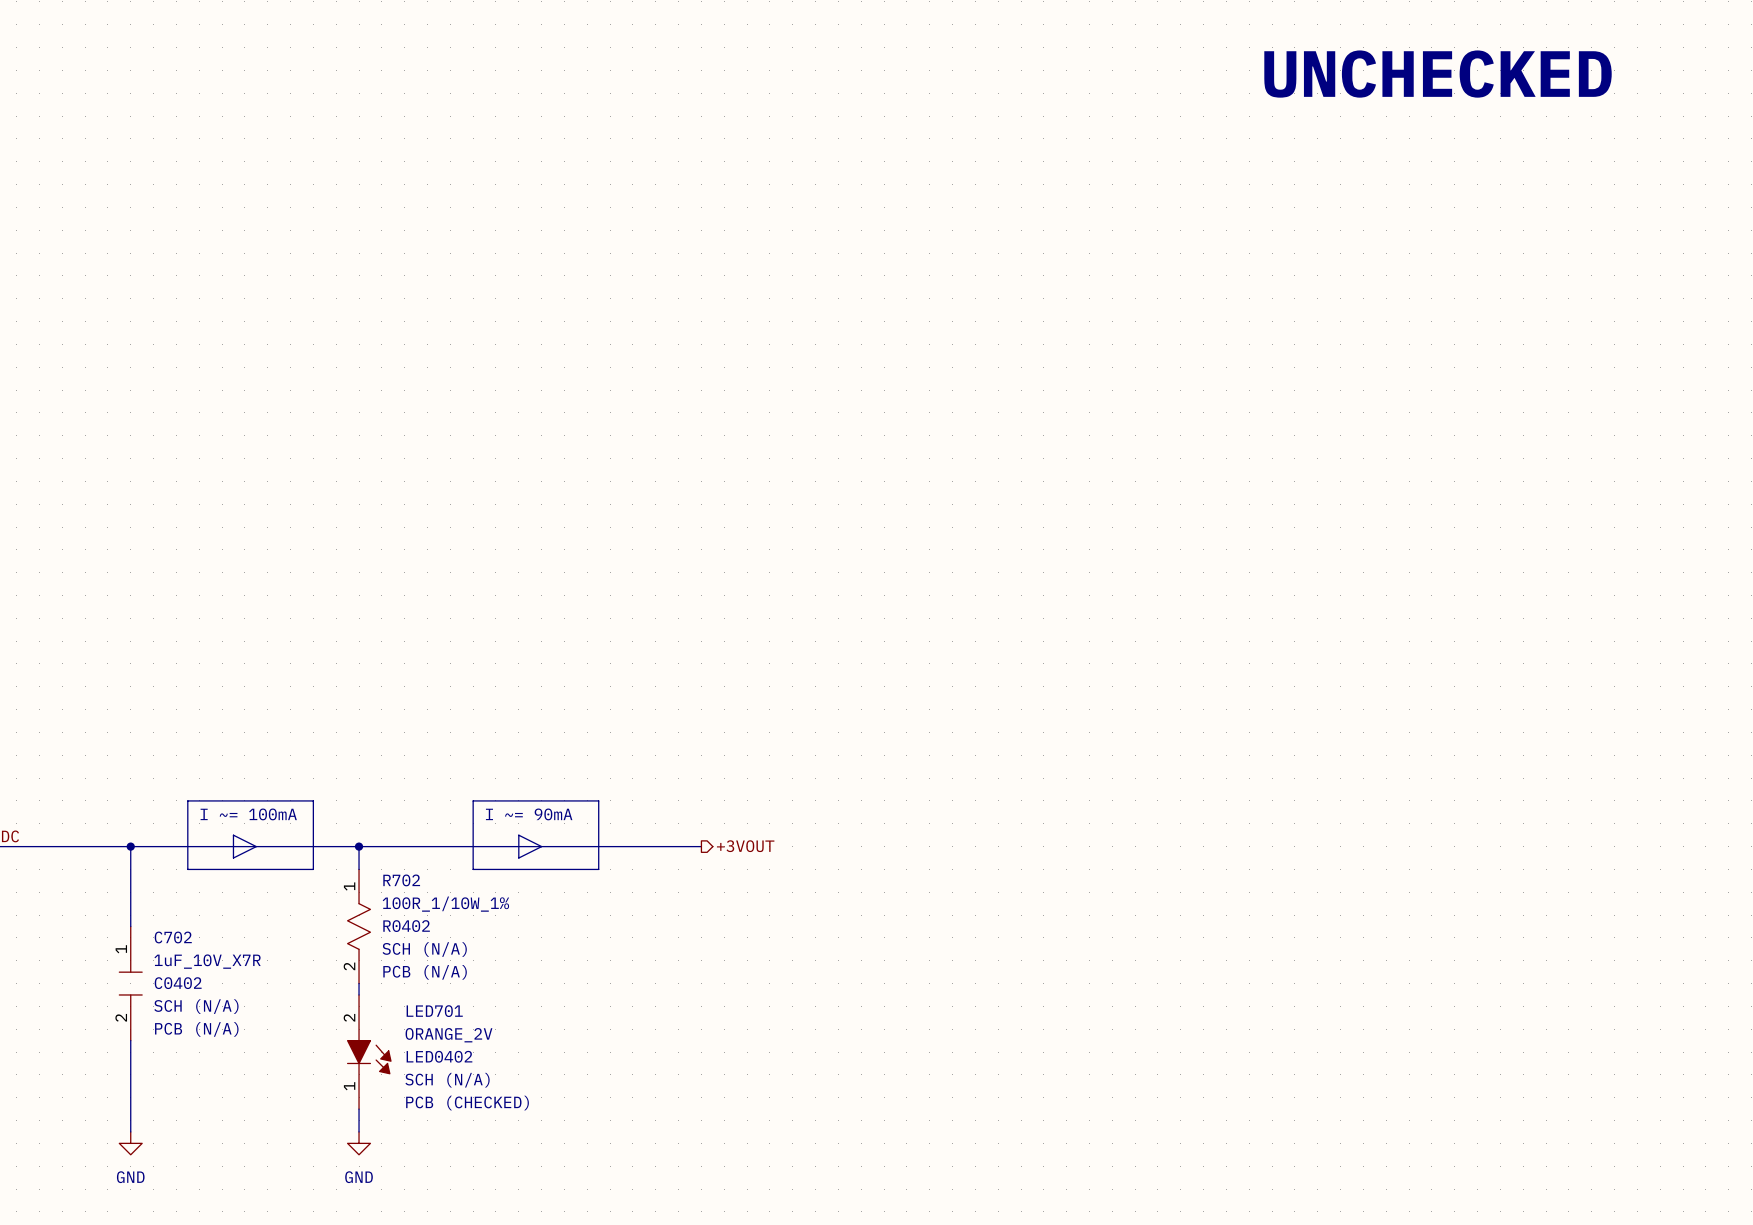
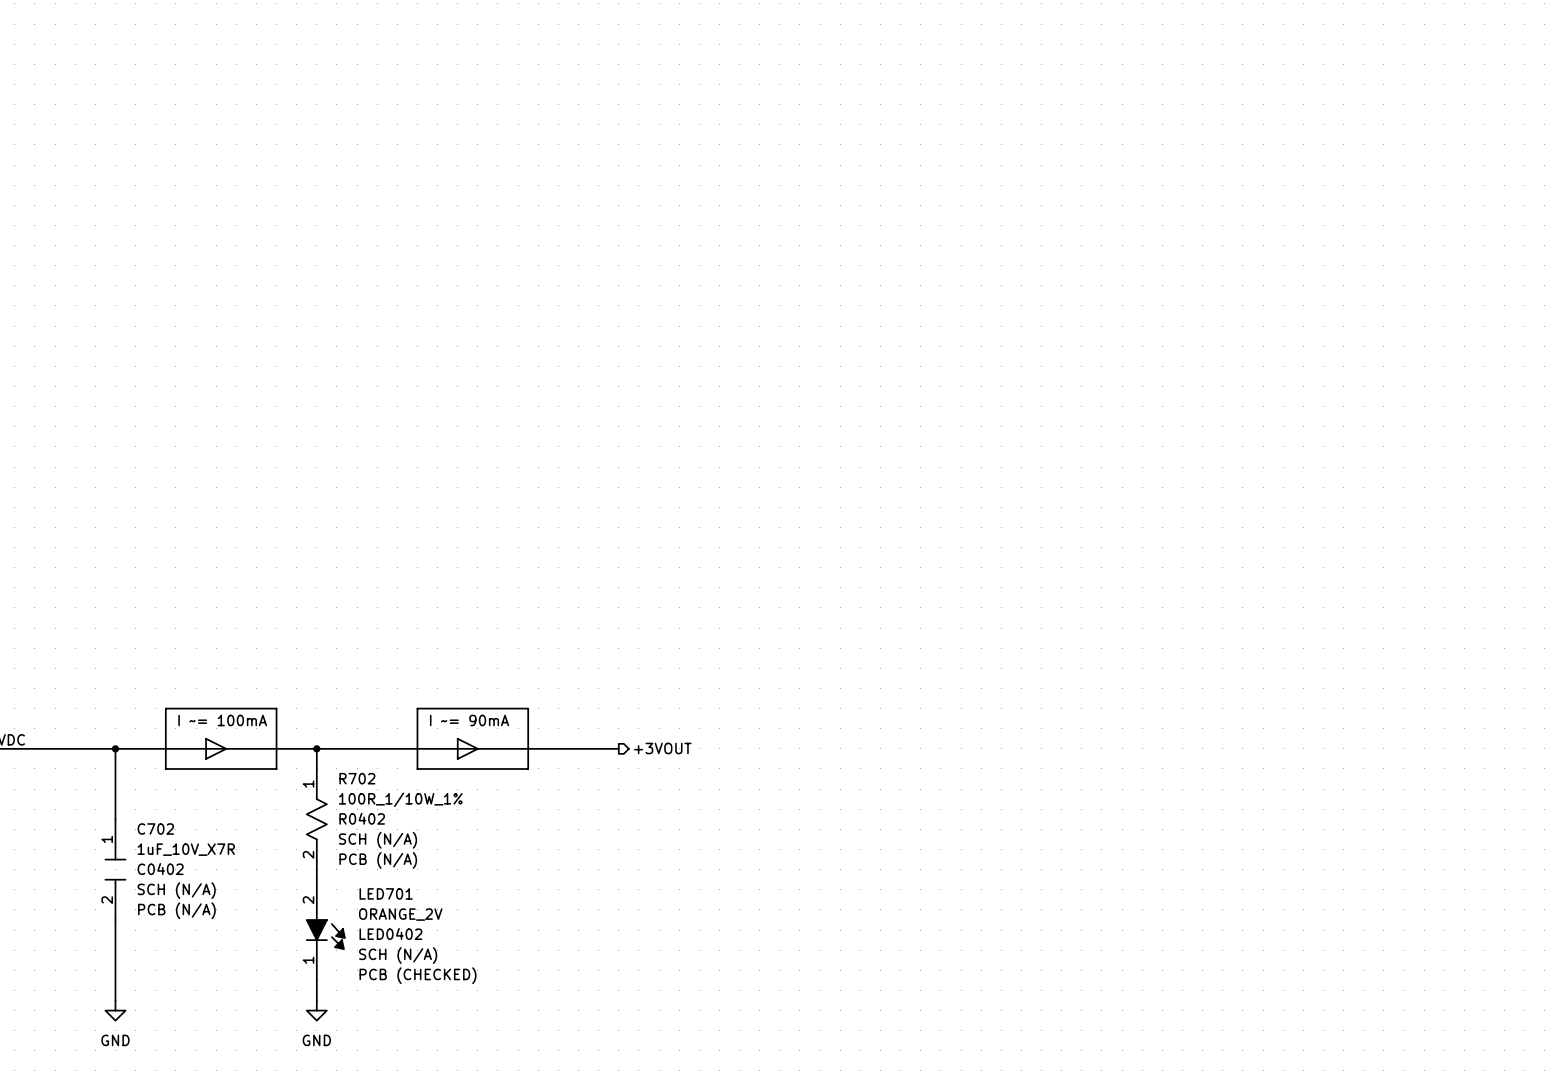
text: UNCHECKED (1438, 74) -> none

